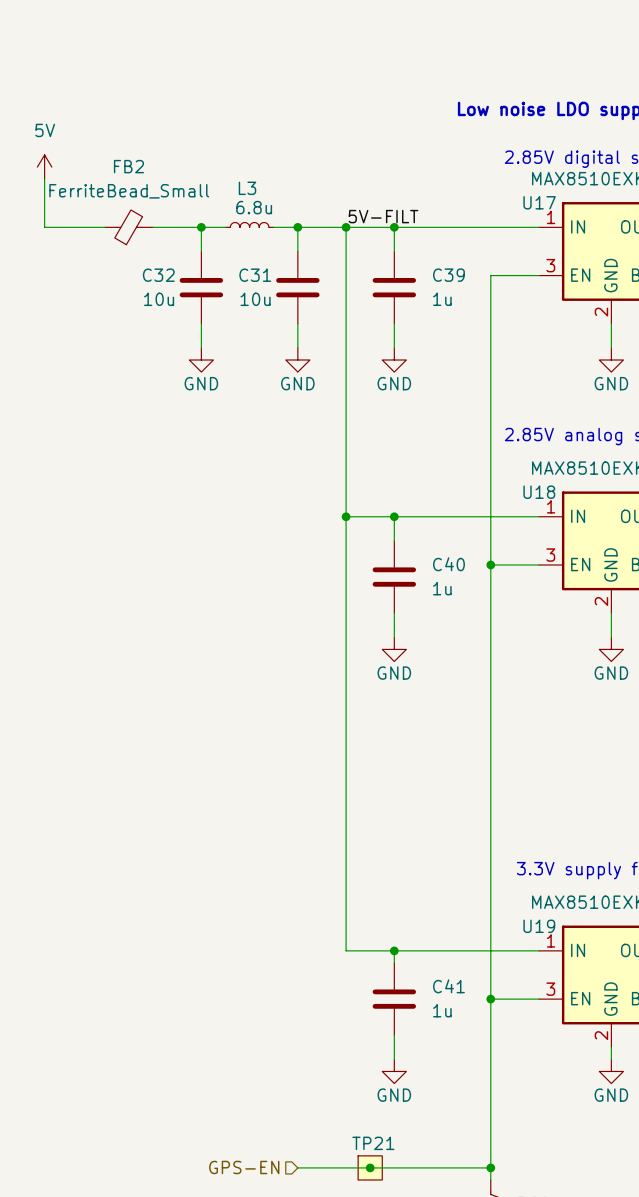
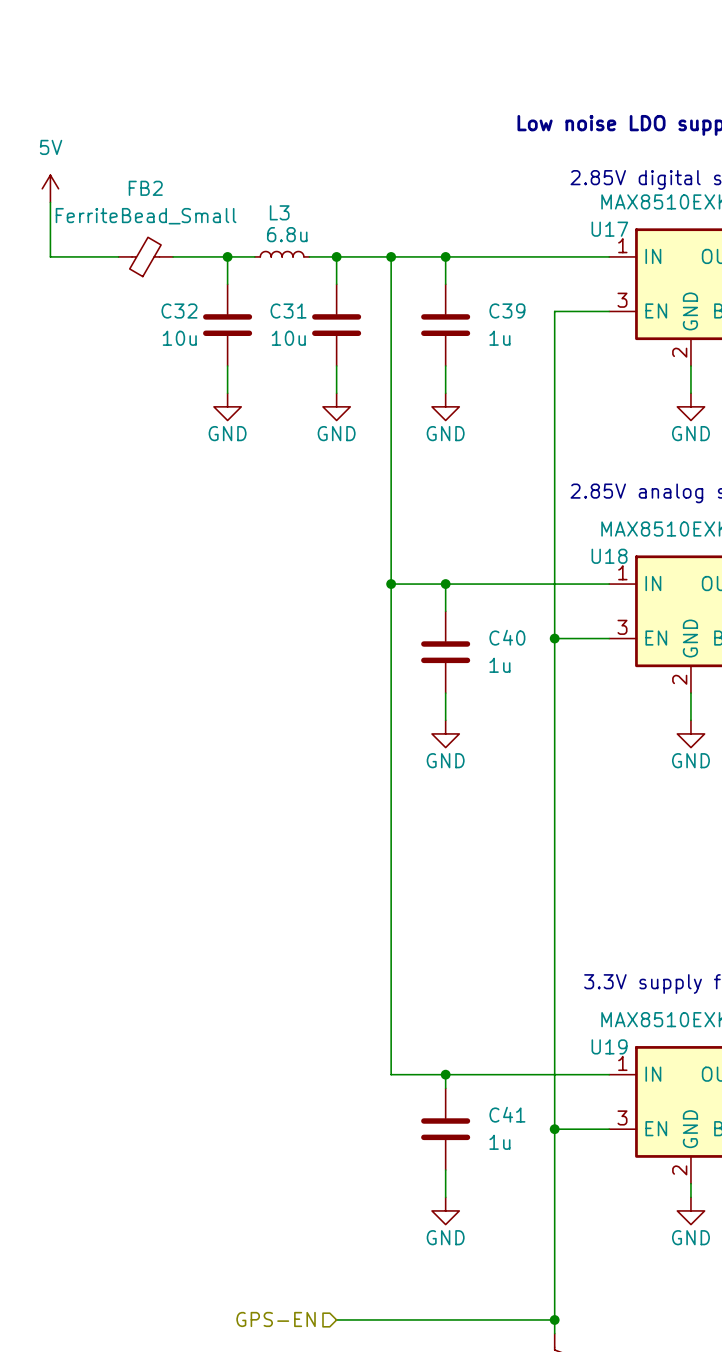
label: 5V-FILT (383, 216) -> none
junction: (370, 1167) -> none
TP21: (370, 1167) -> none

